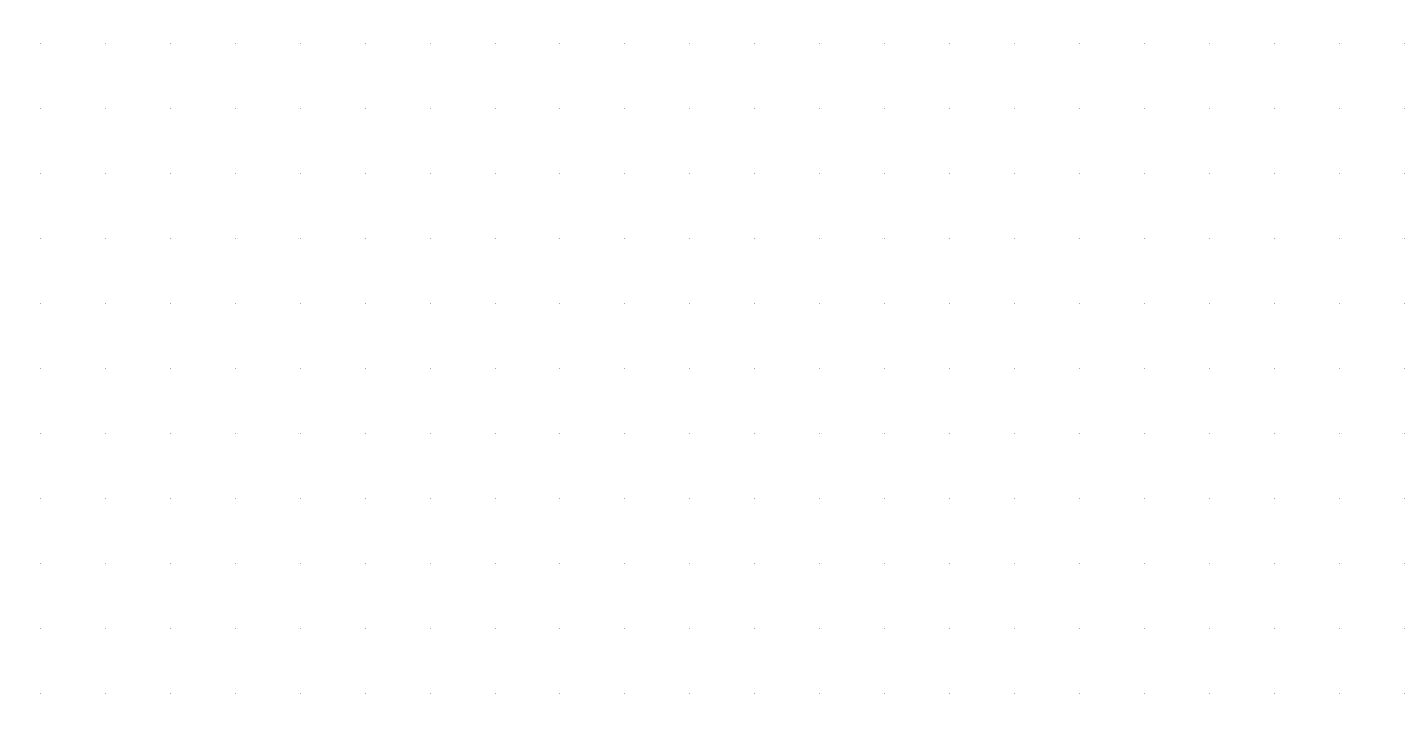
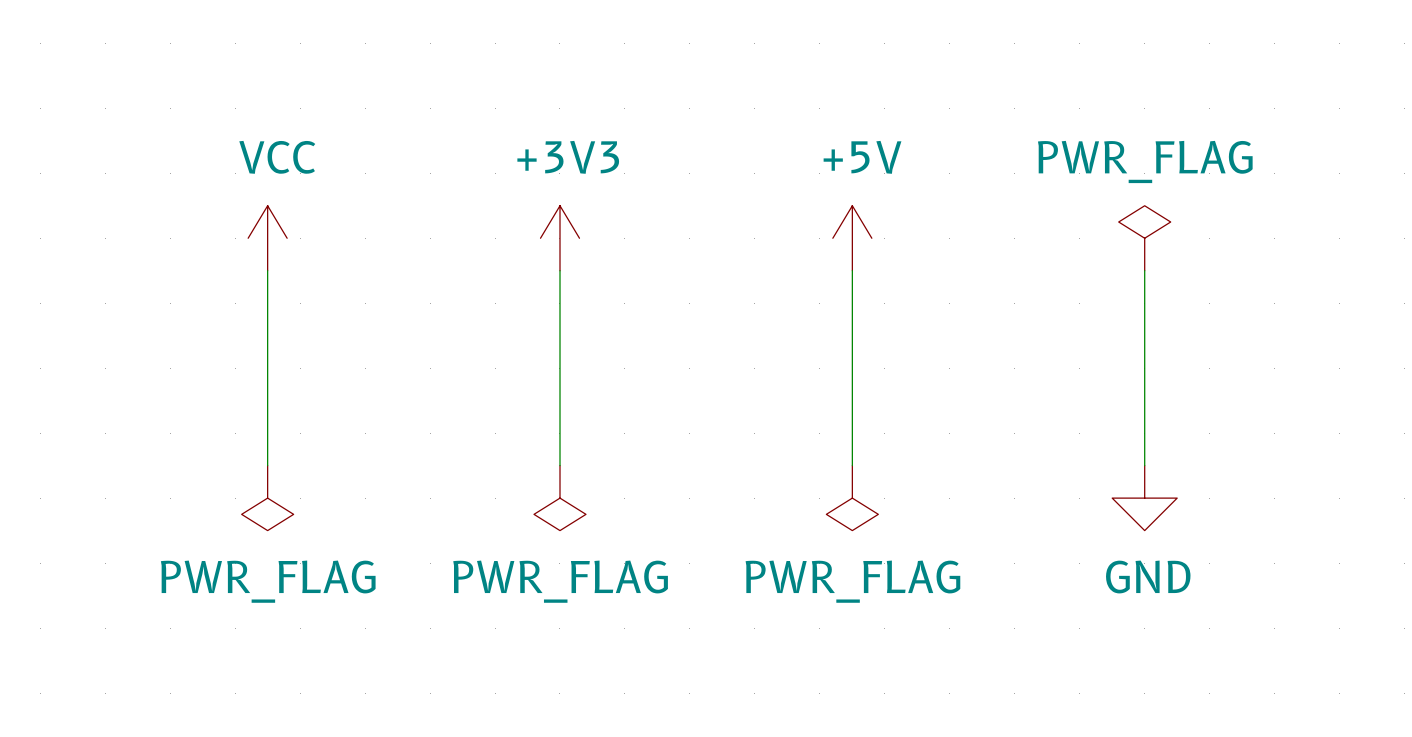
power symbol: none -> VCC (267, 238)
power symbol: none -> +3V3 (559, 238)
power symbol: none -> +5V (852, 238)
power symbol: none -> PWR_FLAG (1144, 238)
wire: none -> (267, 270) (267, 465)
wire: none -> (559, 270) (559, 465)
wire: none -> (852, 270) (852, 465)
wire: none -> (1144, 270) (1144, 465)
power symbol: none -> PWR_FLAG (267, 498)
power symbol: none -> PWR_FLAG (559, 498)
power symbol: none -> PWR_FLAG (852, 498)
power symbol: none -> GND (1144, 498)

